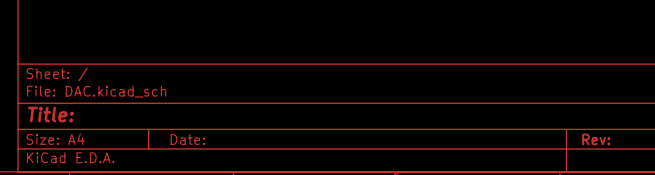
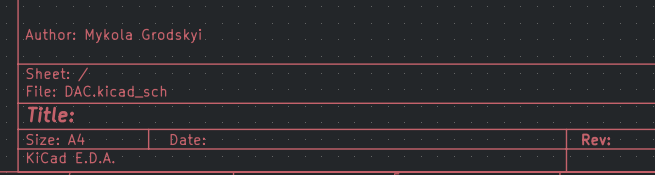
title block: none -> Author: Mykola Grodskyi (113, 36)

